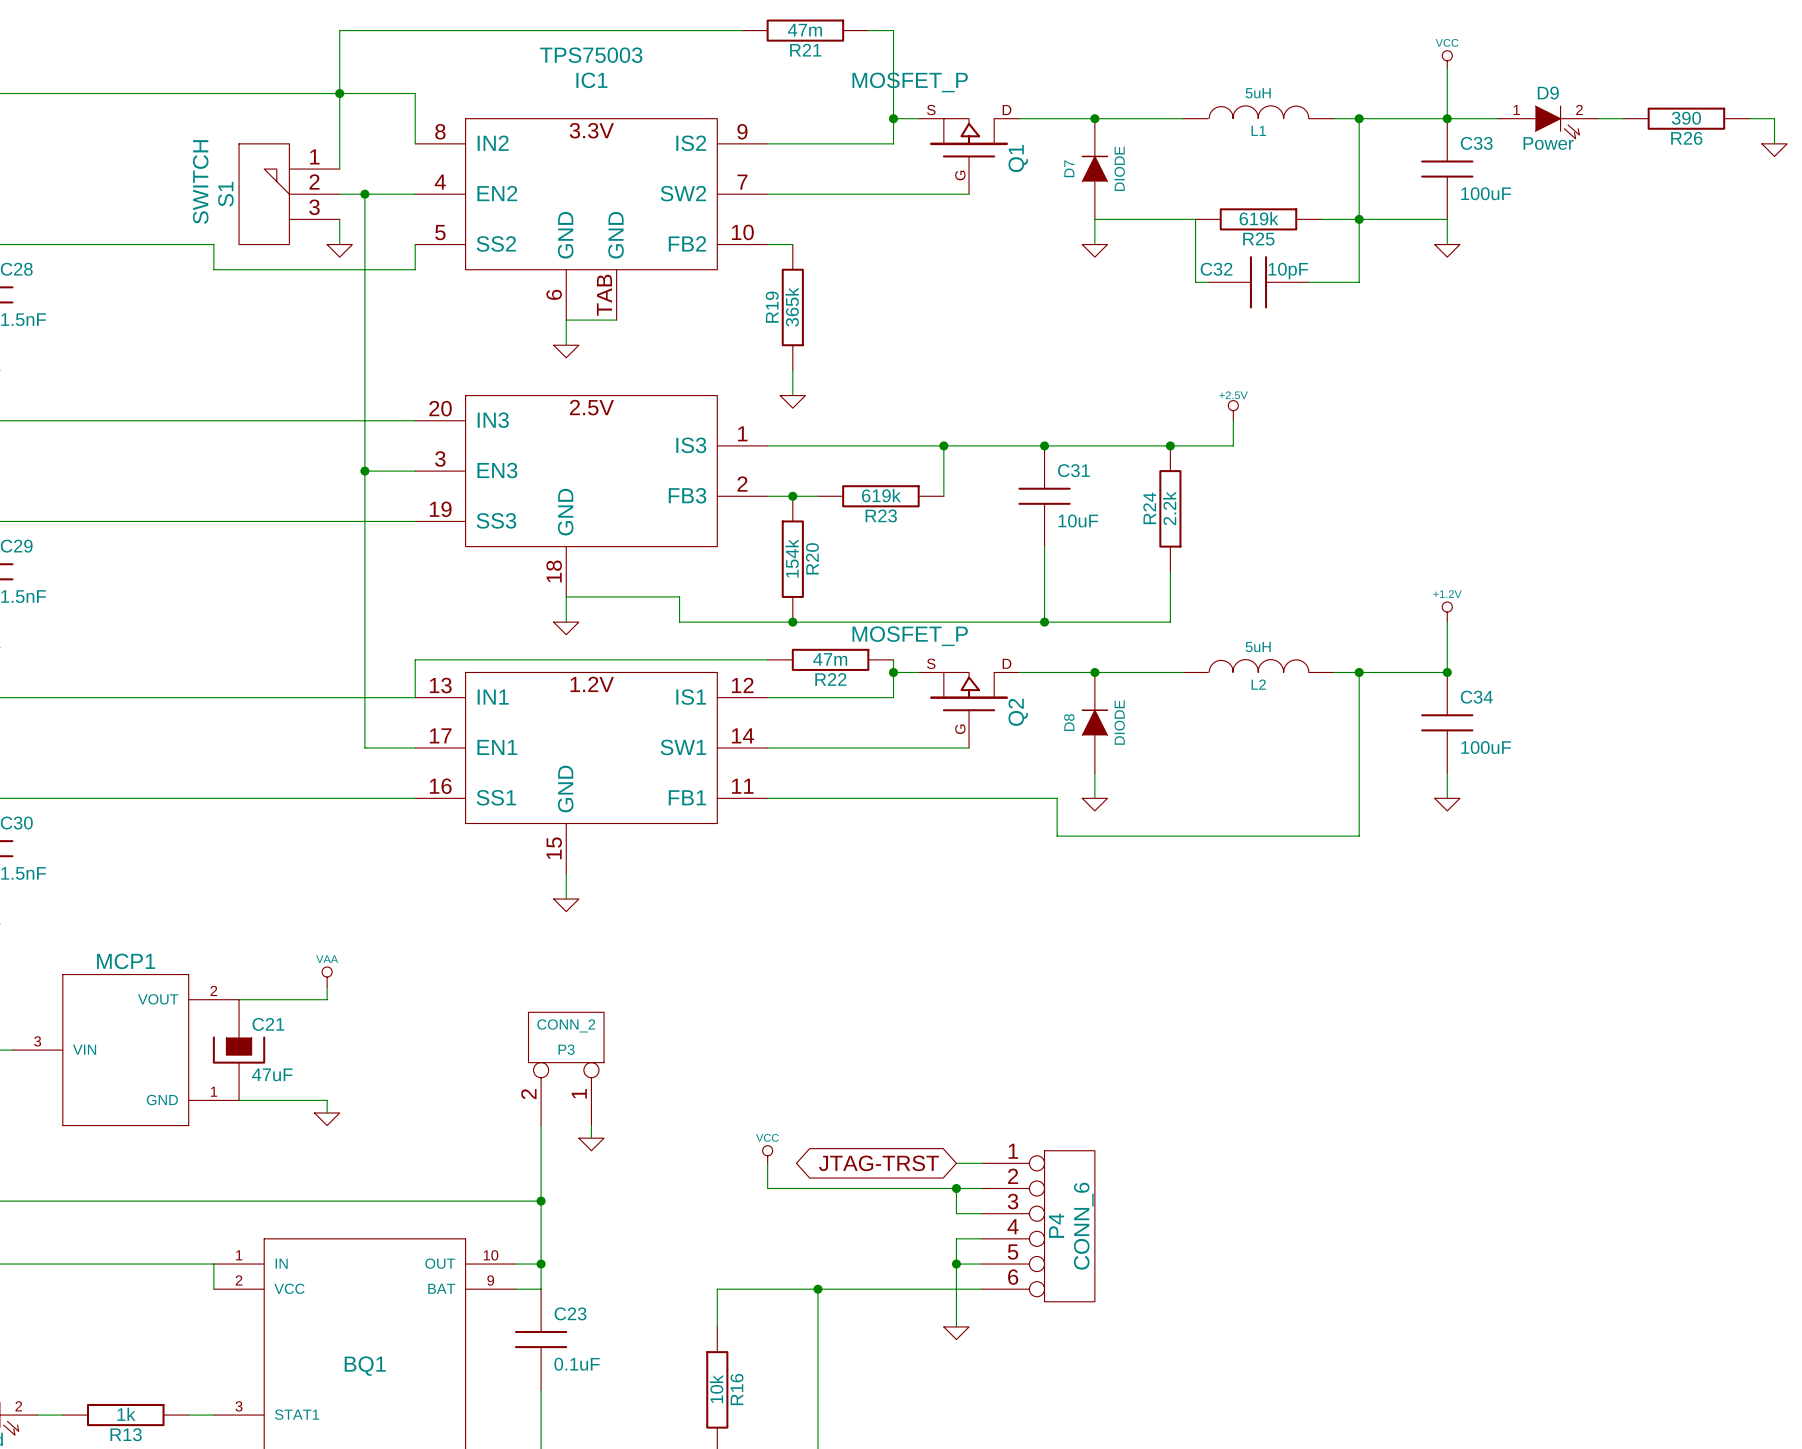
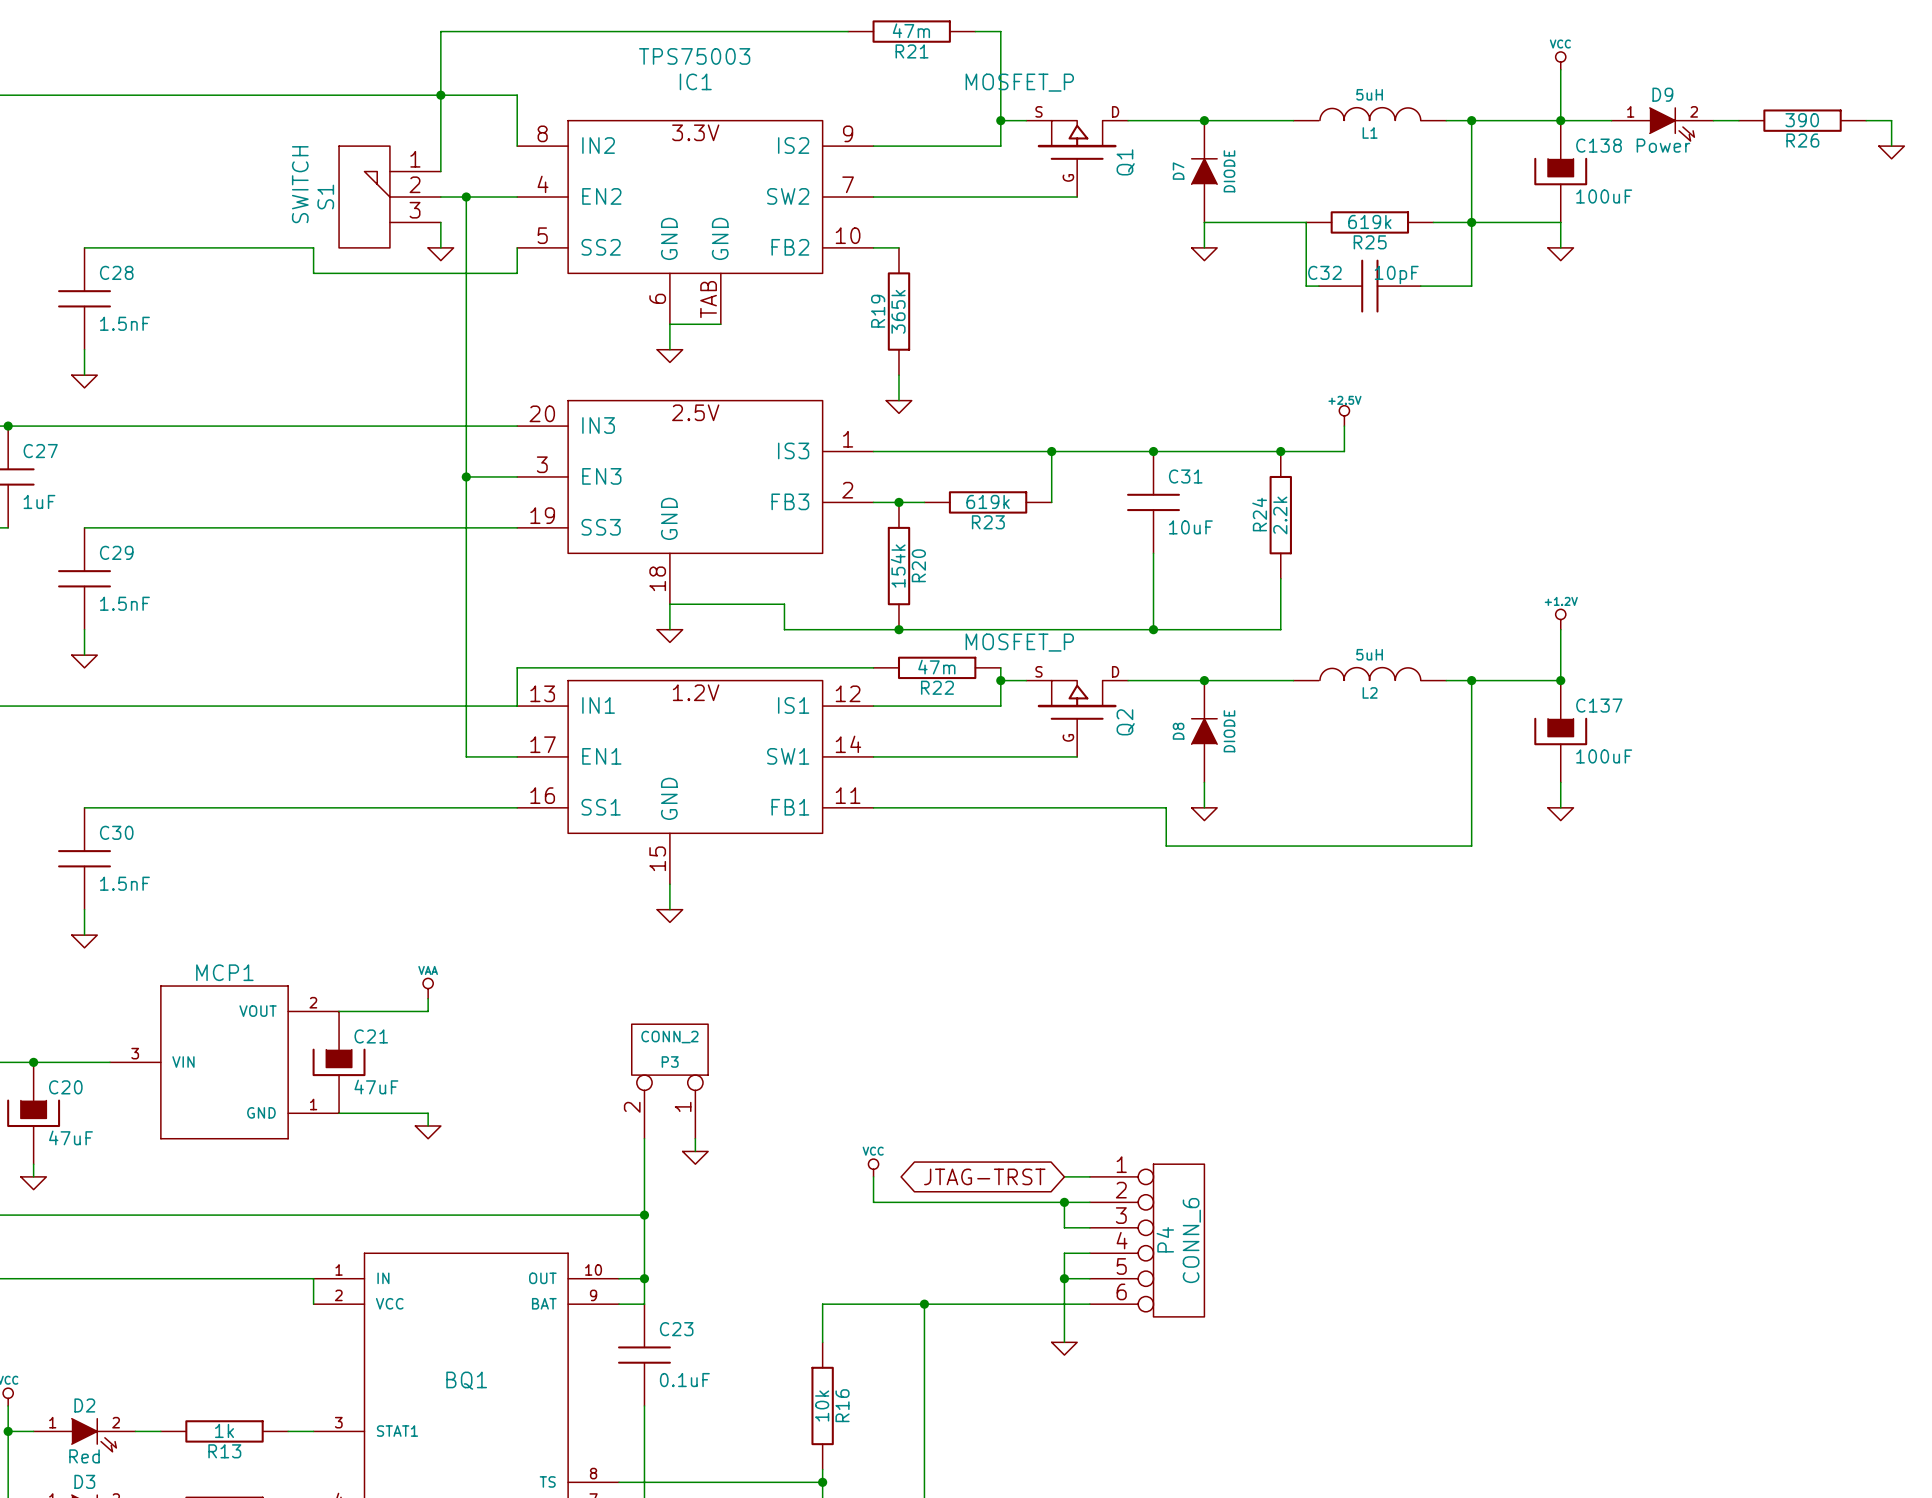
C33: 100uF (1447, 169) -> none
C138: none -> 100uF (1560, 171)
C34: 100uF (1447, 722) -> none
C137: none -> 100uF (1560, 731)

